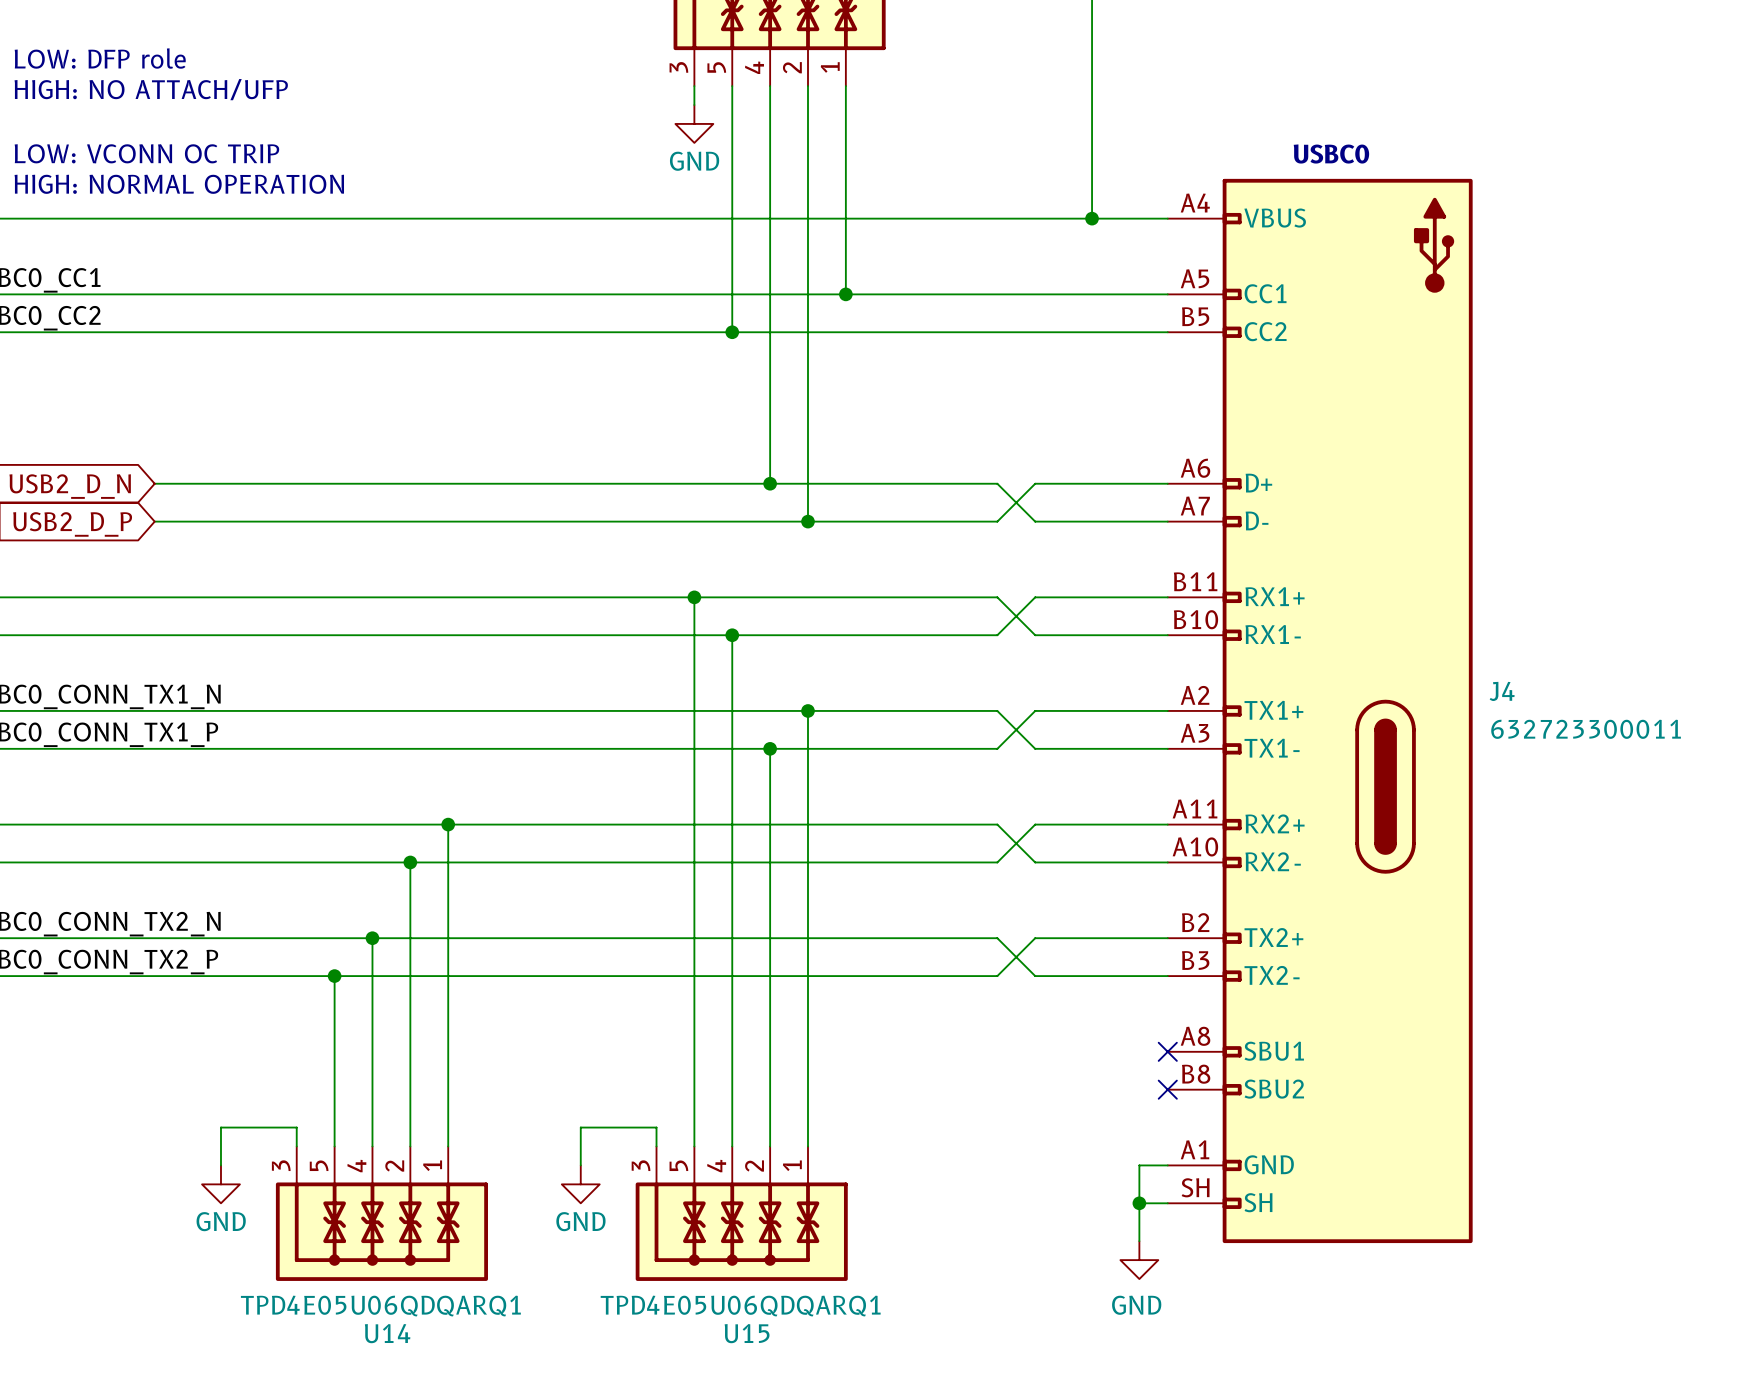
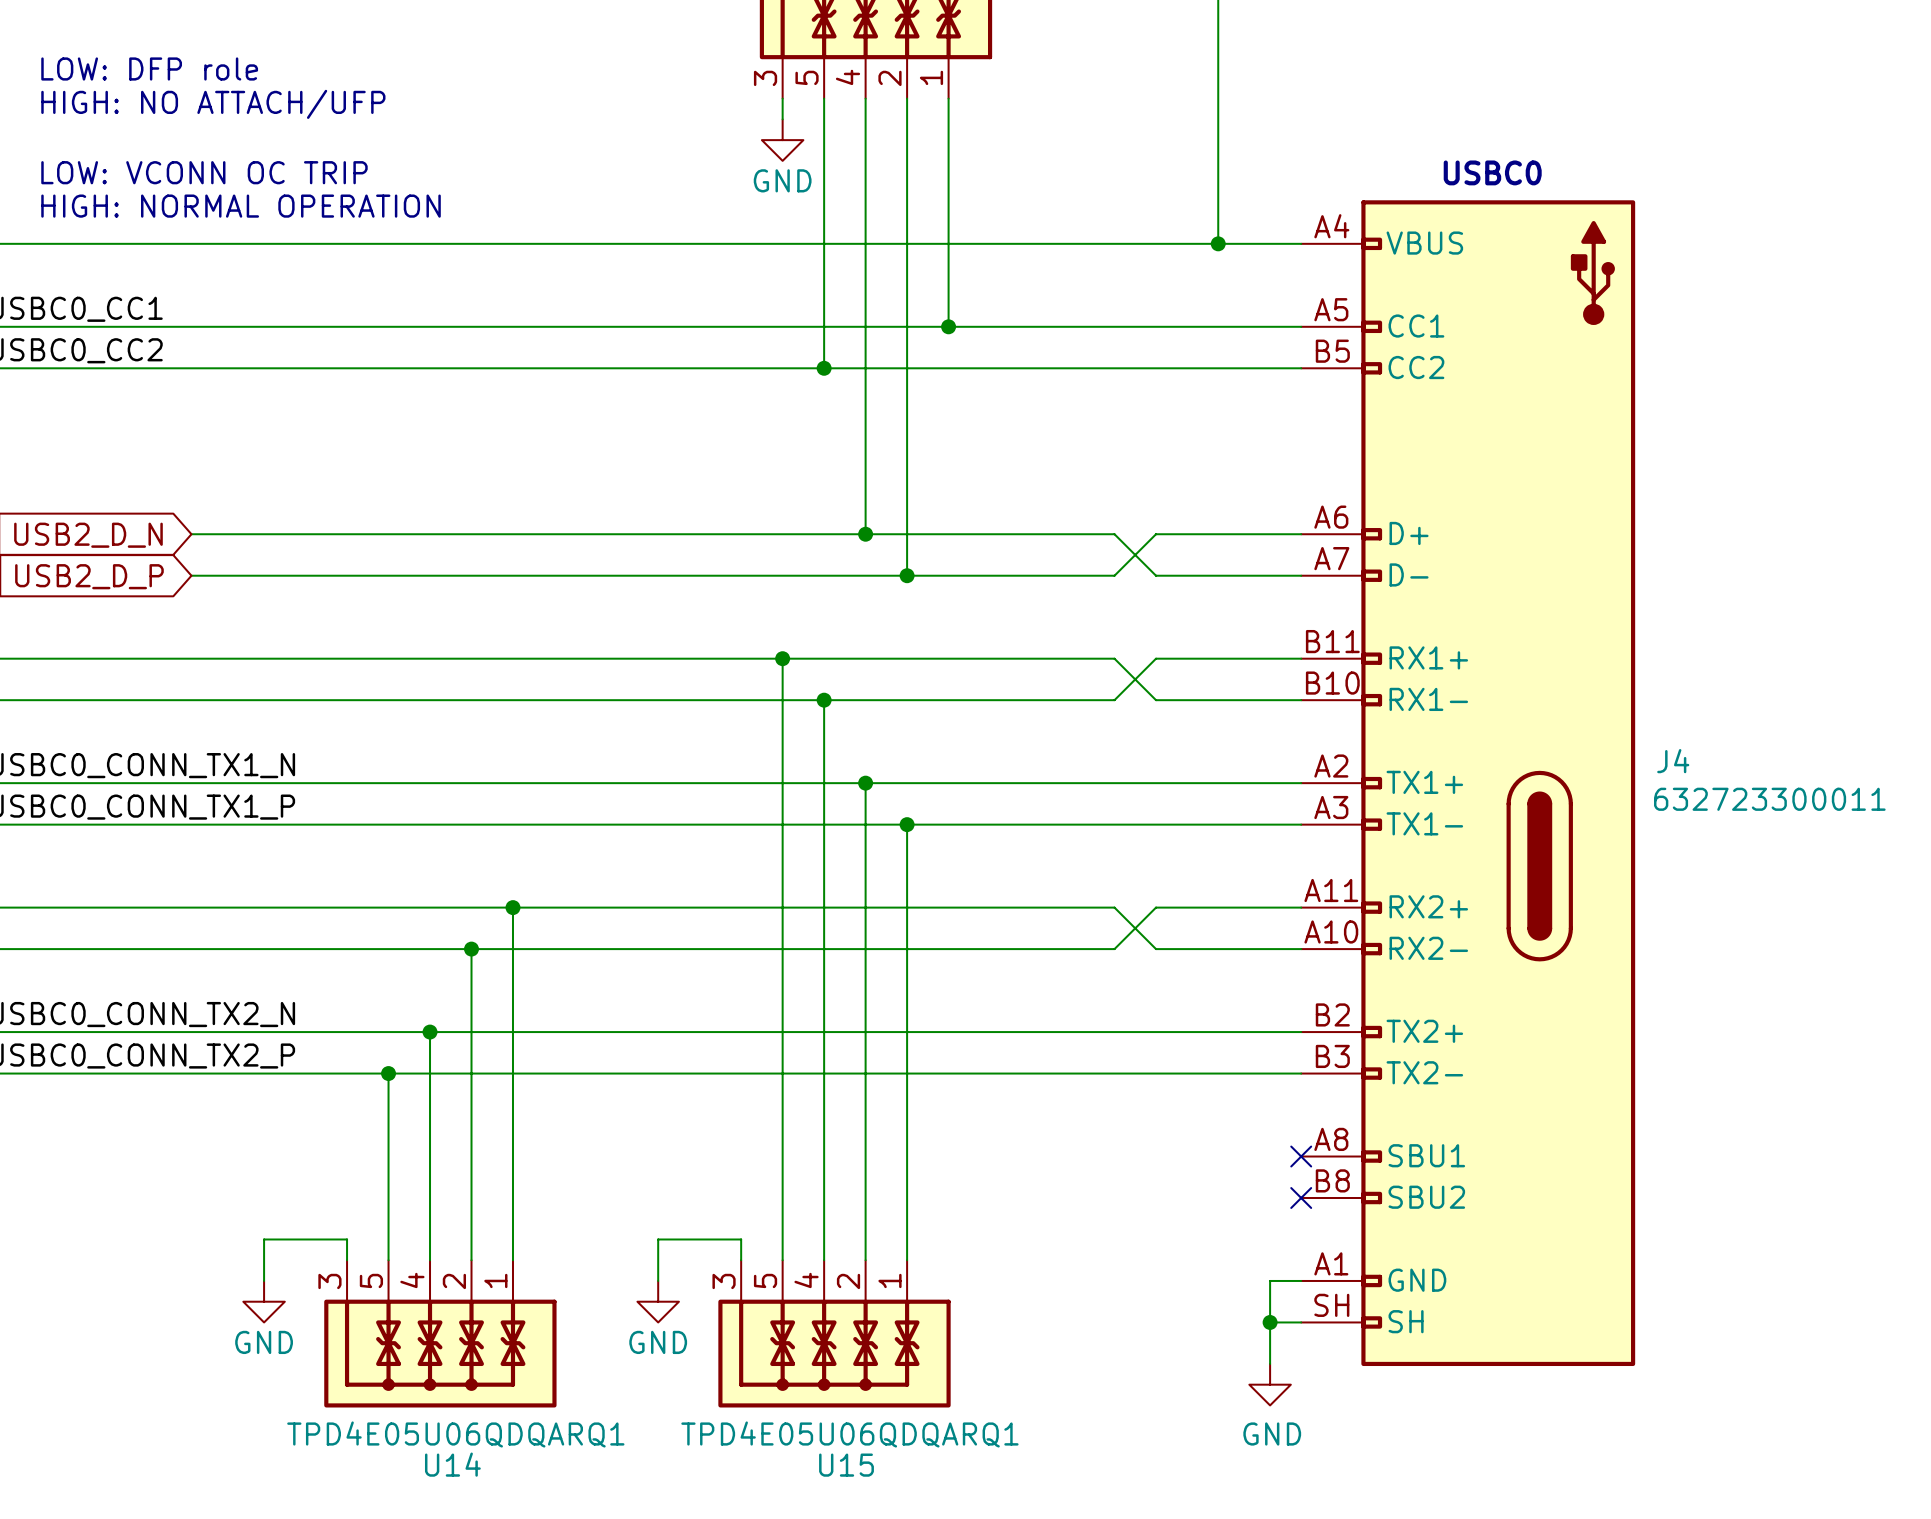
junction: none -> (865, 783)
wire: (808, 710) (808, 748) -> (865, 783) (865, 824)
junction: (808, 710) -> none
wire: (997, 710) (1035, 748) -> (1114, 783) (1156, 783)
wire: (1035, 710) (997, 748) -> (1156, 824) (1114, 824)
J4 value: none -> 632723300011 (1769, 799)
J4 text: 632723300011 (1586, 729) -> none
junction: (770, 748) -> none
junction: none -> (907, 824)
wire: (997, 938) (1035, 976) -> (1114, 1032) (1156, 1032)
wire: (1035, 938) (997, 976) -> (1156, 1073) (1114, 1073)

